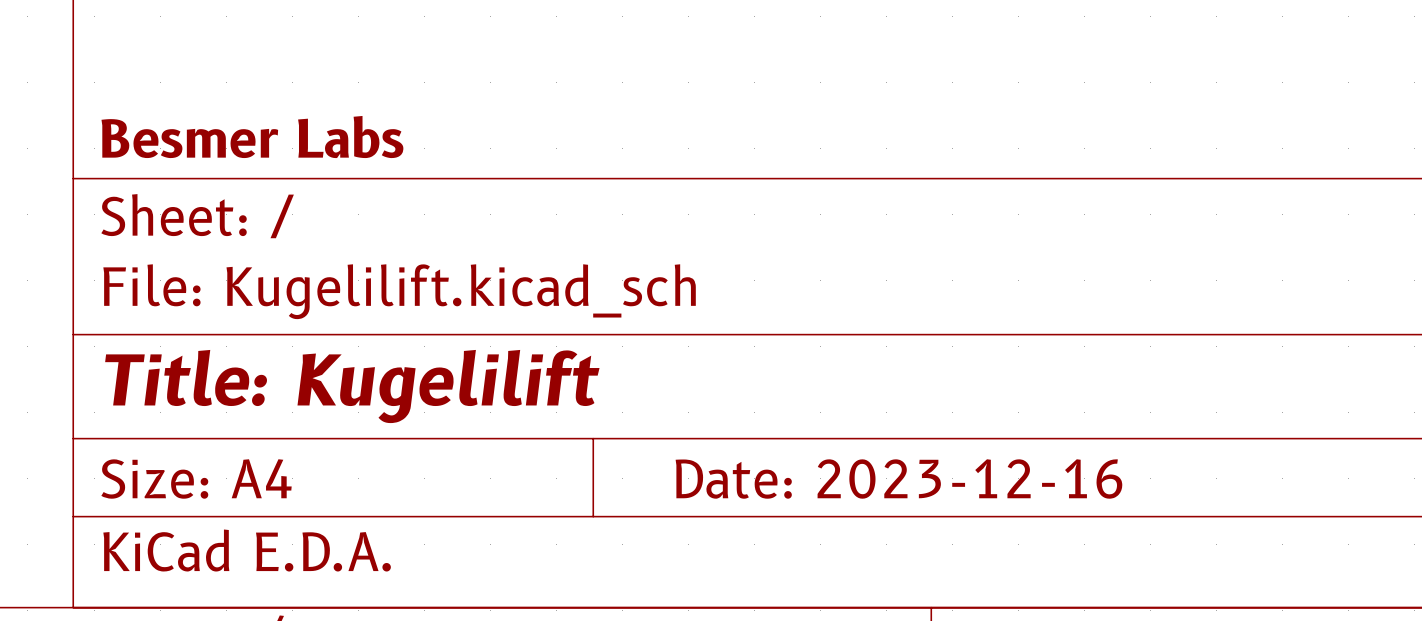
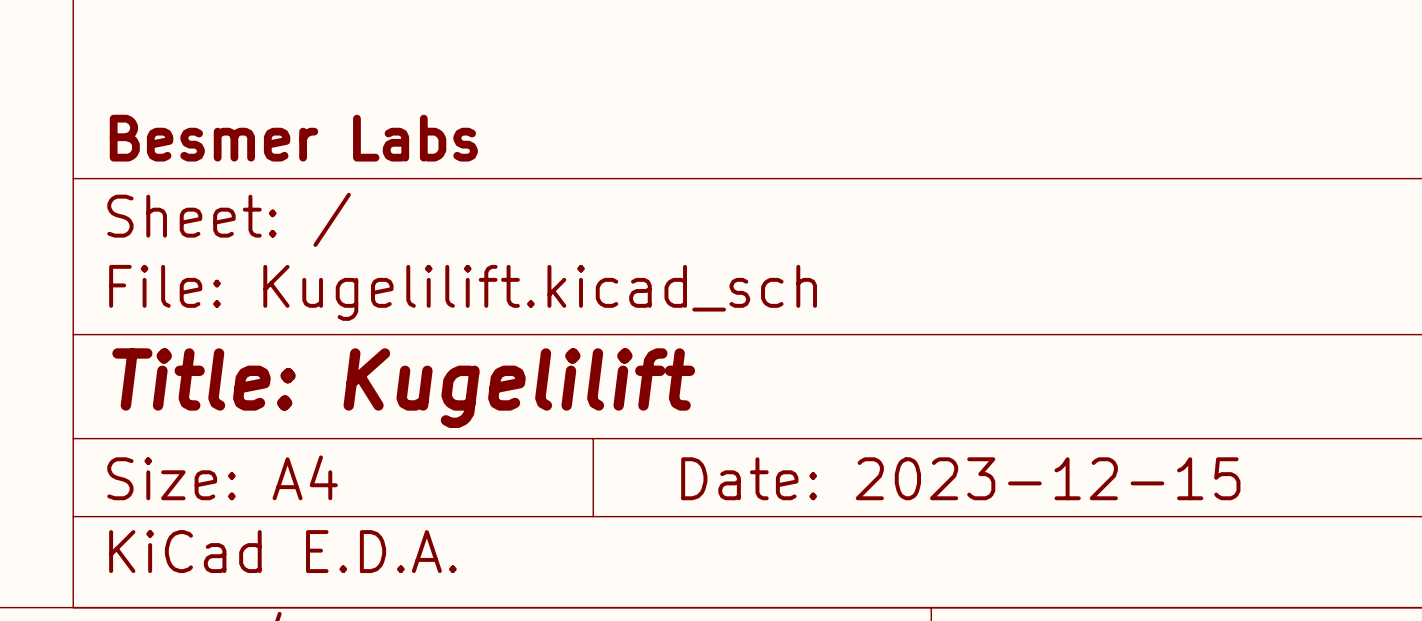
title block: Date: 2023-12-16 (898, 478) -> Date: 2023-12-15 (960, 478)

